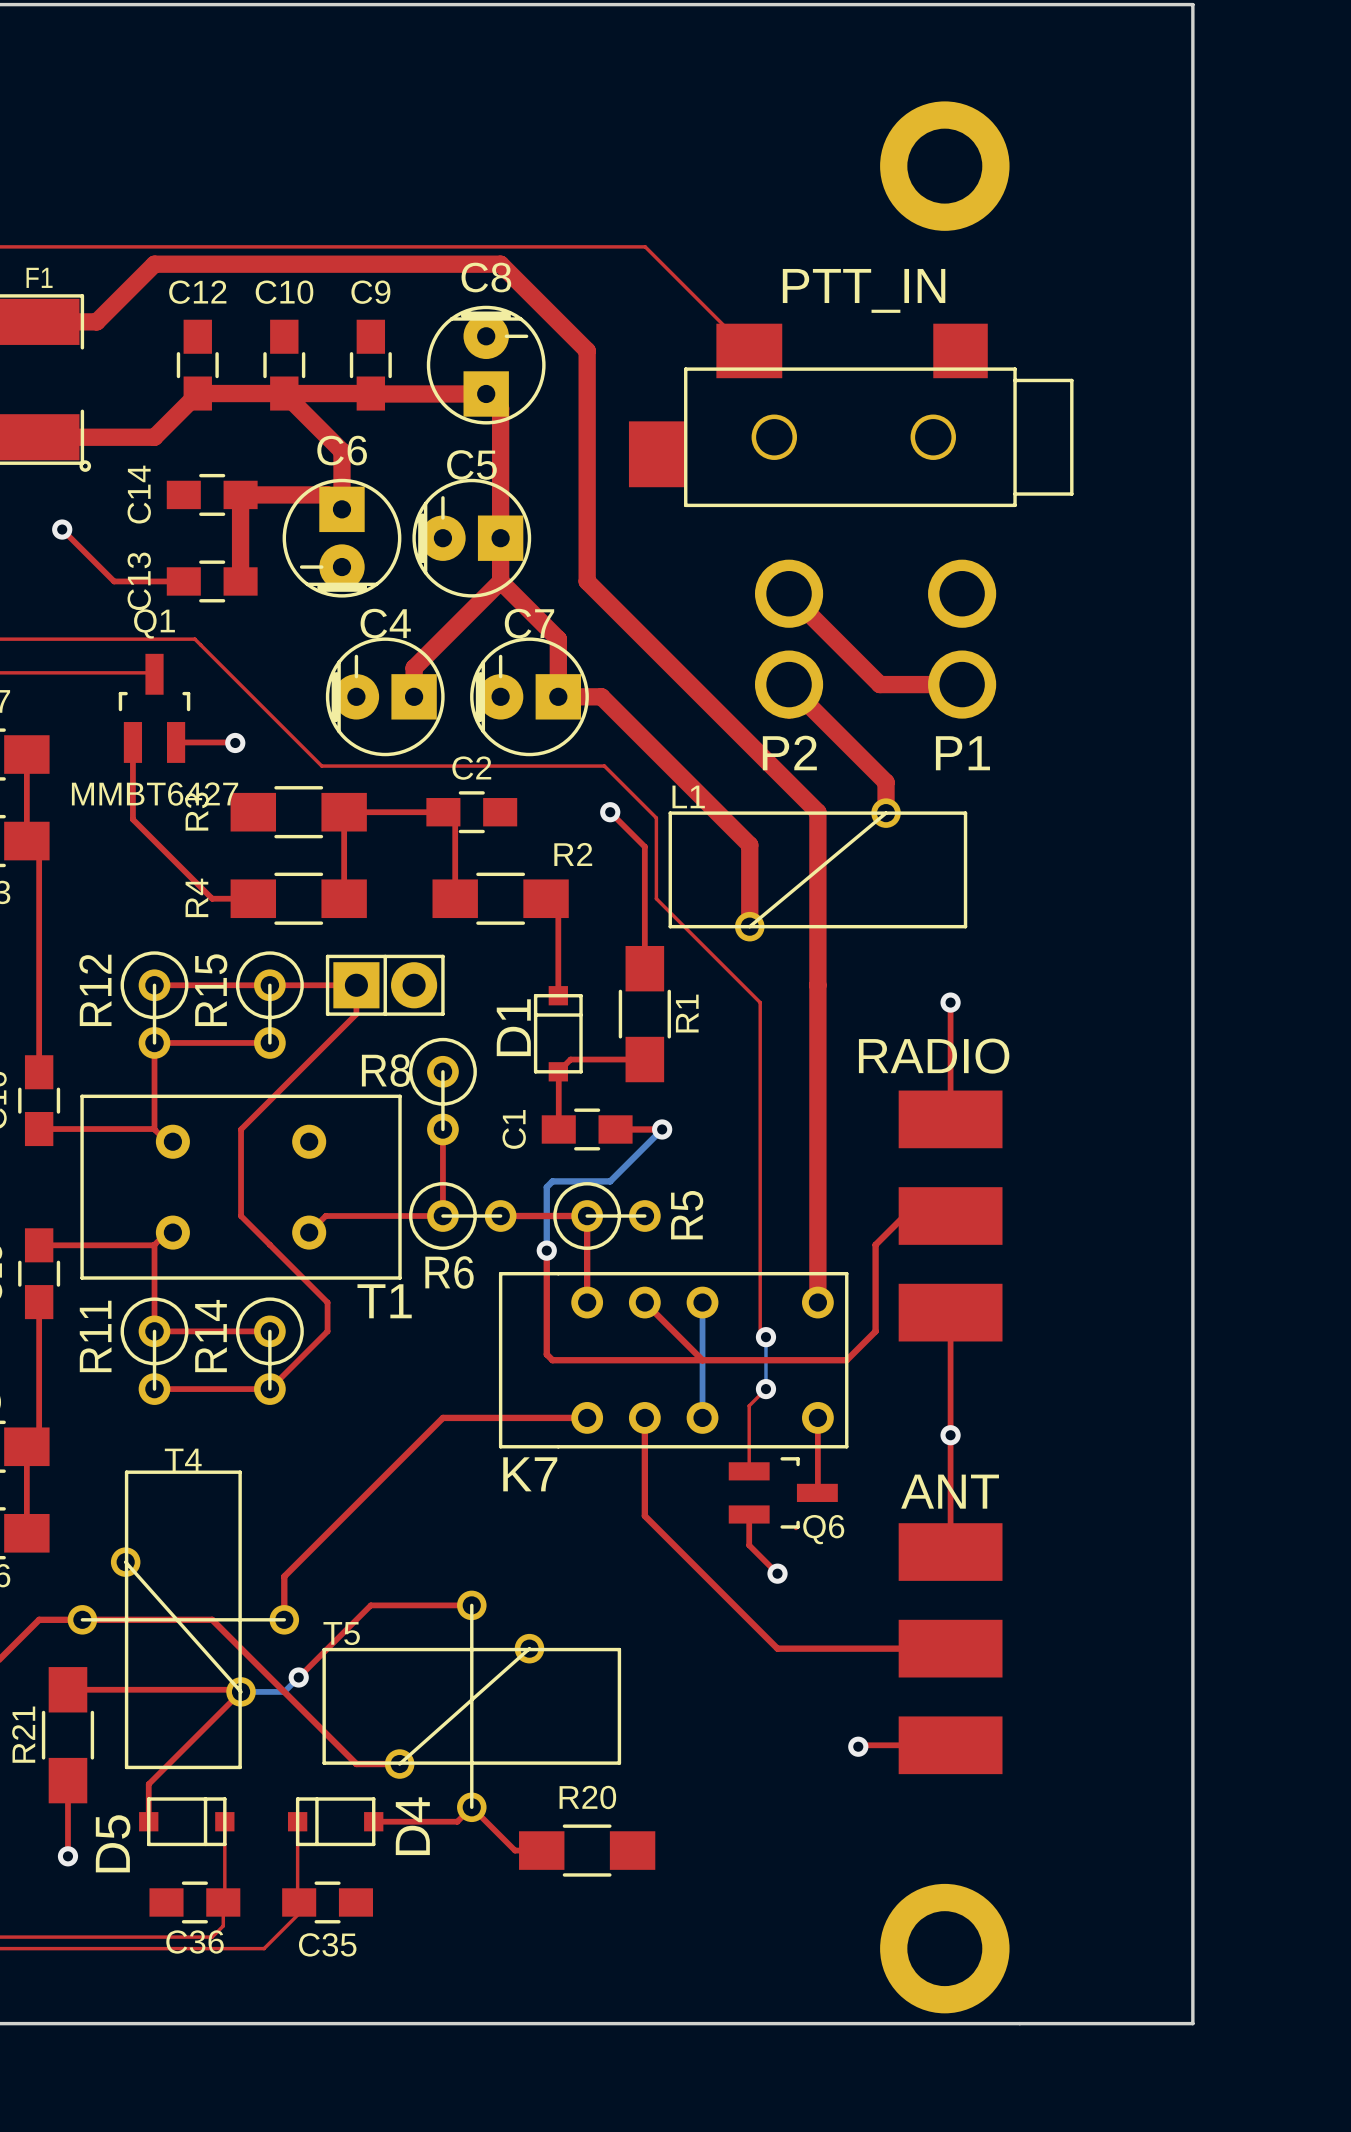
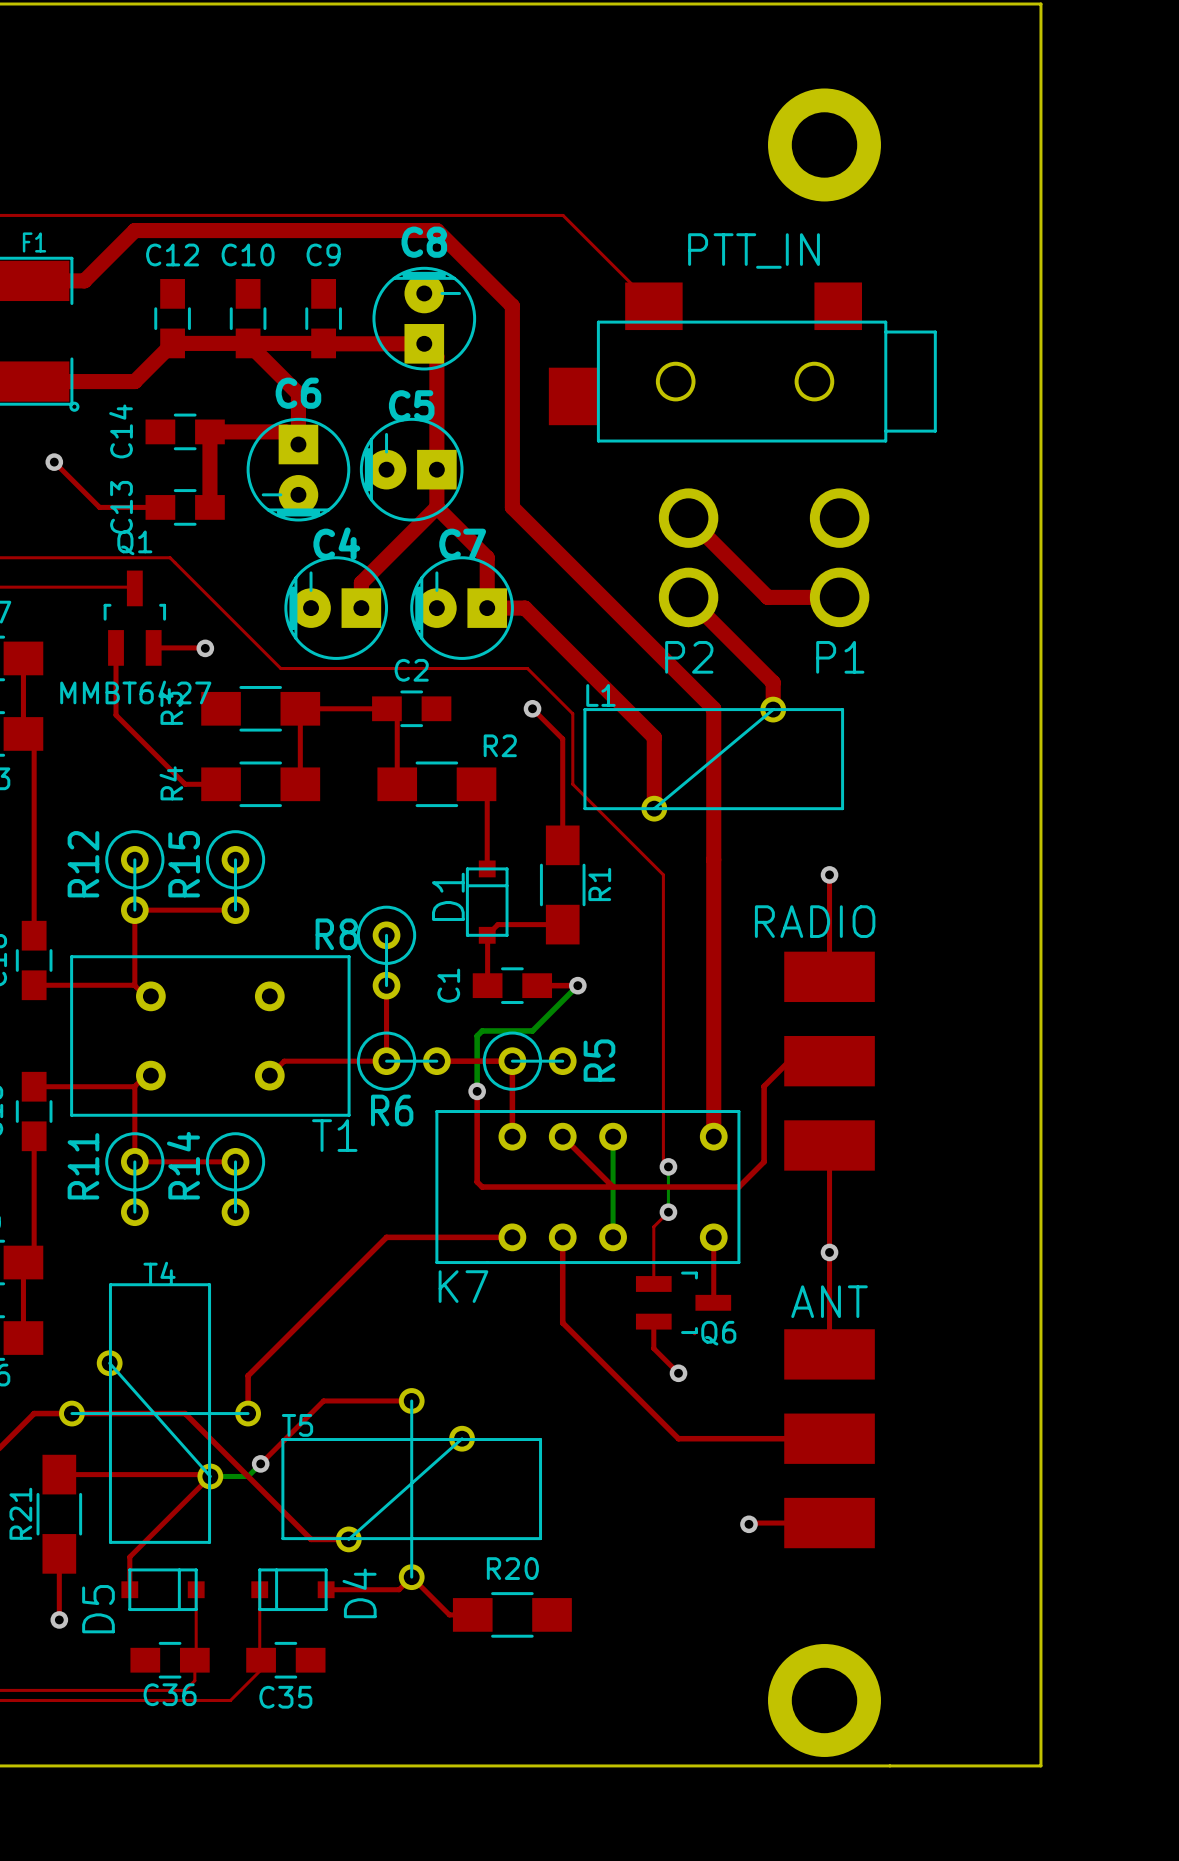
top track: (154, 985) (356, 985) (356, 1014) (241, 1129) (241, 1216) (327, 1302) (327, 1331) (269, 1389) (154, 1389) -> none
part: (385, 985) -> none

